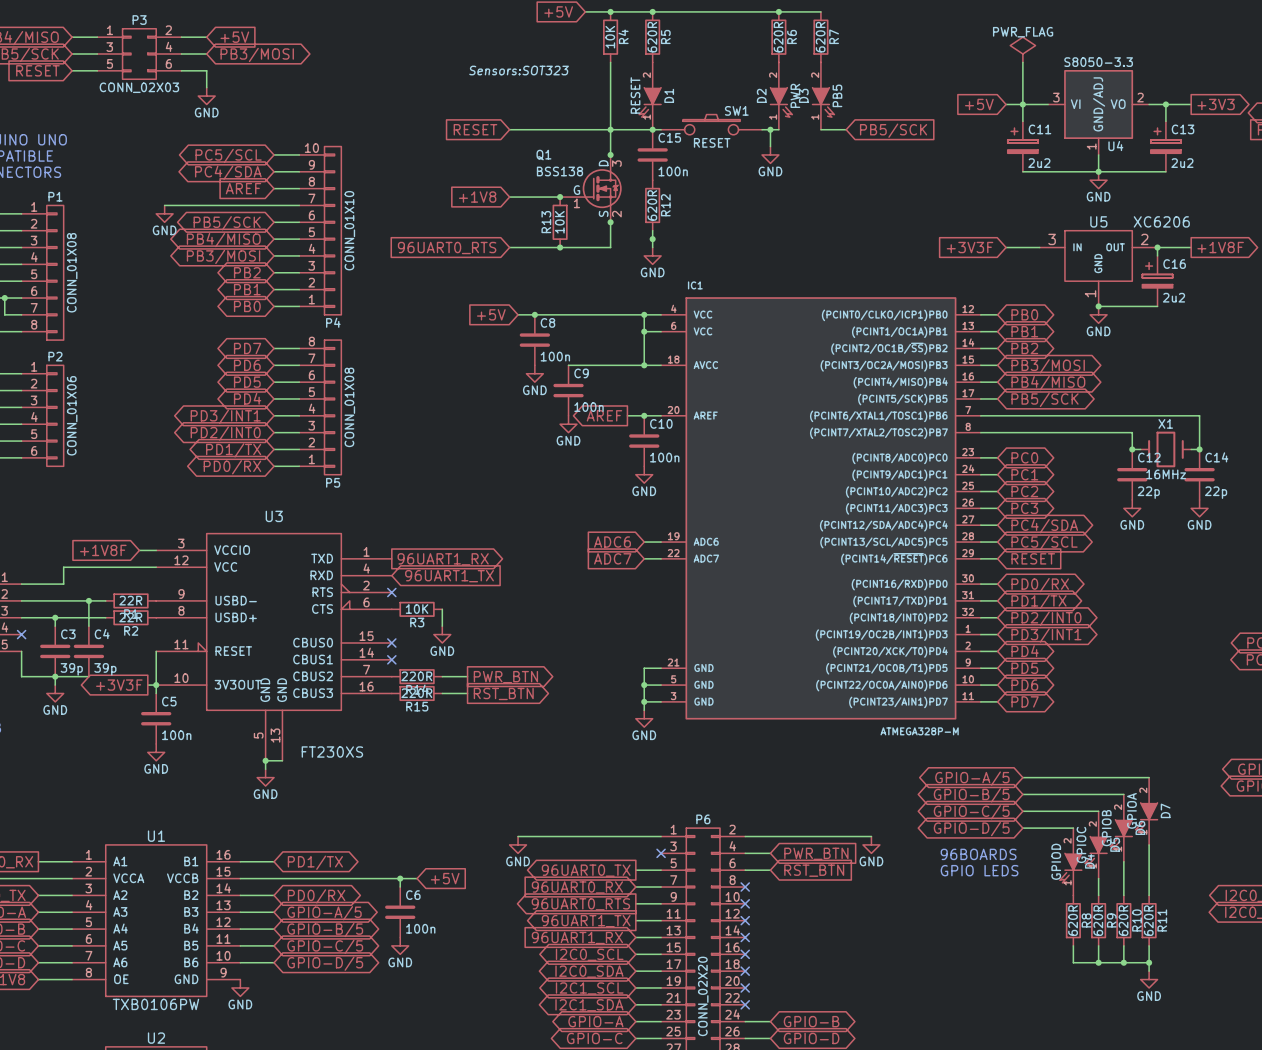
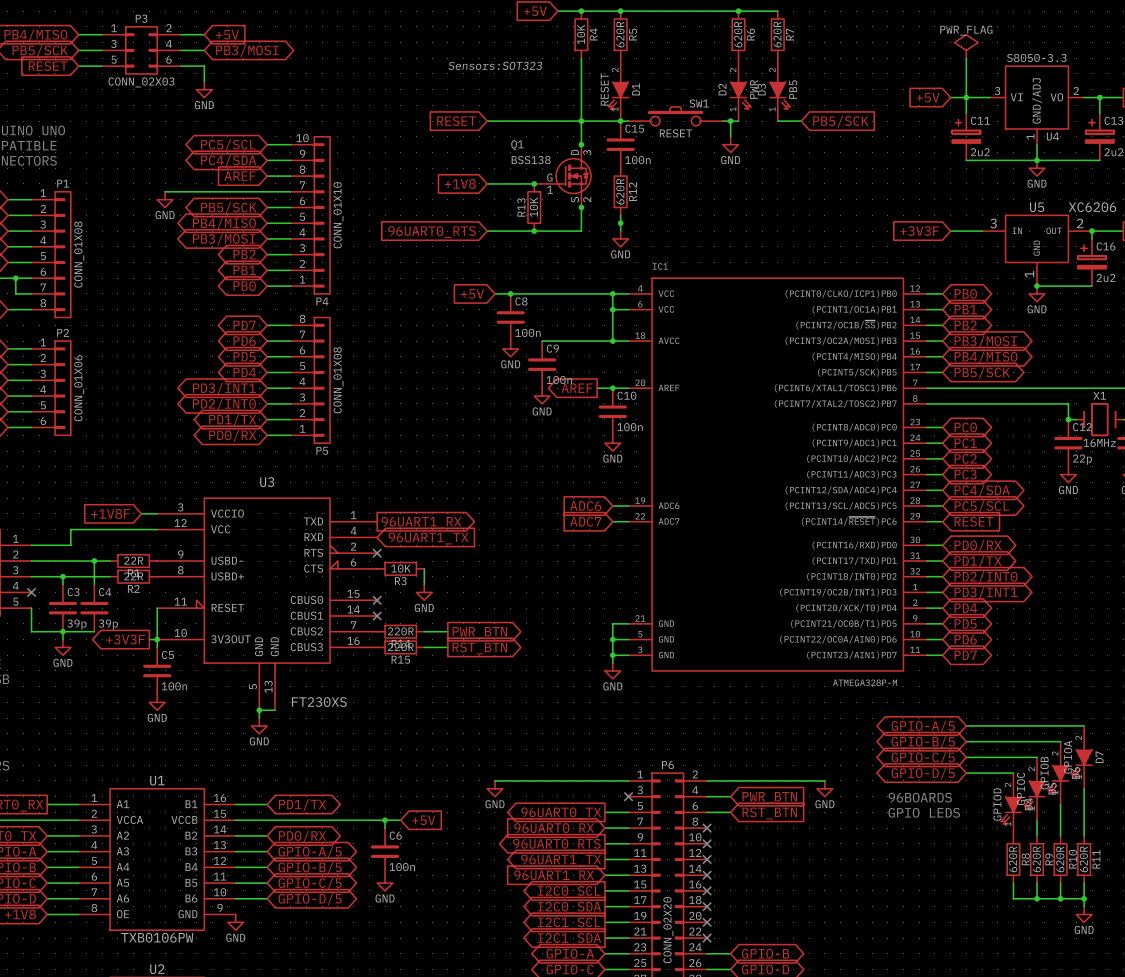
global label shape: bidirectional (589, 954) -> output (569, 891)
global label shape: bidirectional (589, 971) -> output (569, 907)
global label shape: bidirectional (589, 988) -> output (569, 923)
global label shape: bidirectional (589, 1005) -> output (569, 939)

